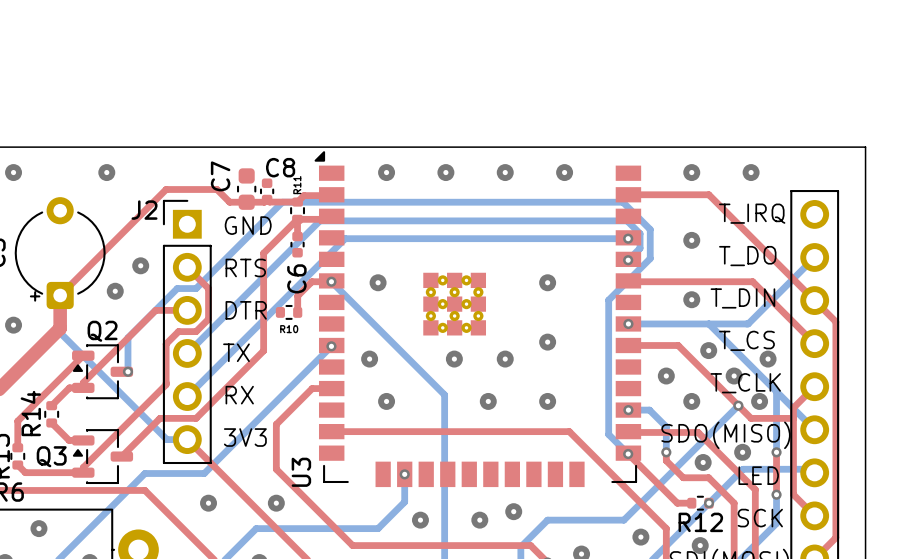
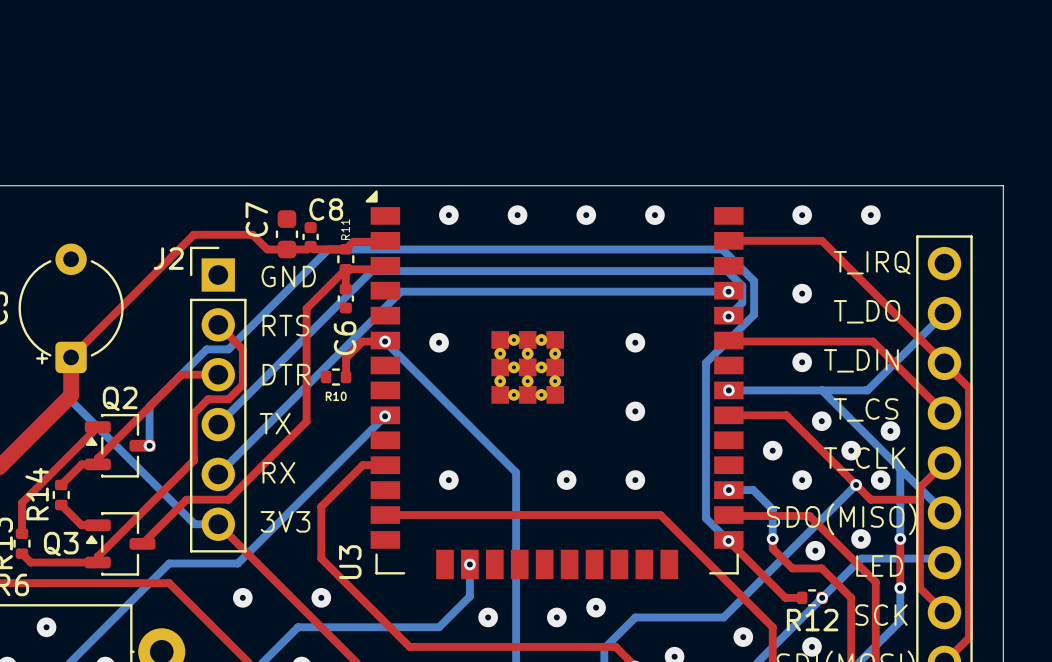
via: (13, 172) -> none
via: (106, 172) -> none
via: (140, 265) -> none
via: (115, 291) -> none
via: (13, 325) -> none
via: (369, 359) -> none
via: (454, 359) -> none
via: (505, 359) -> none

